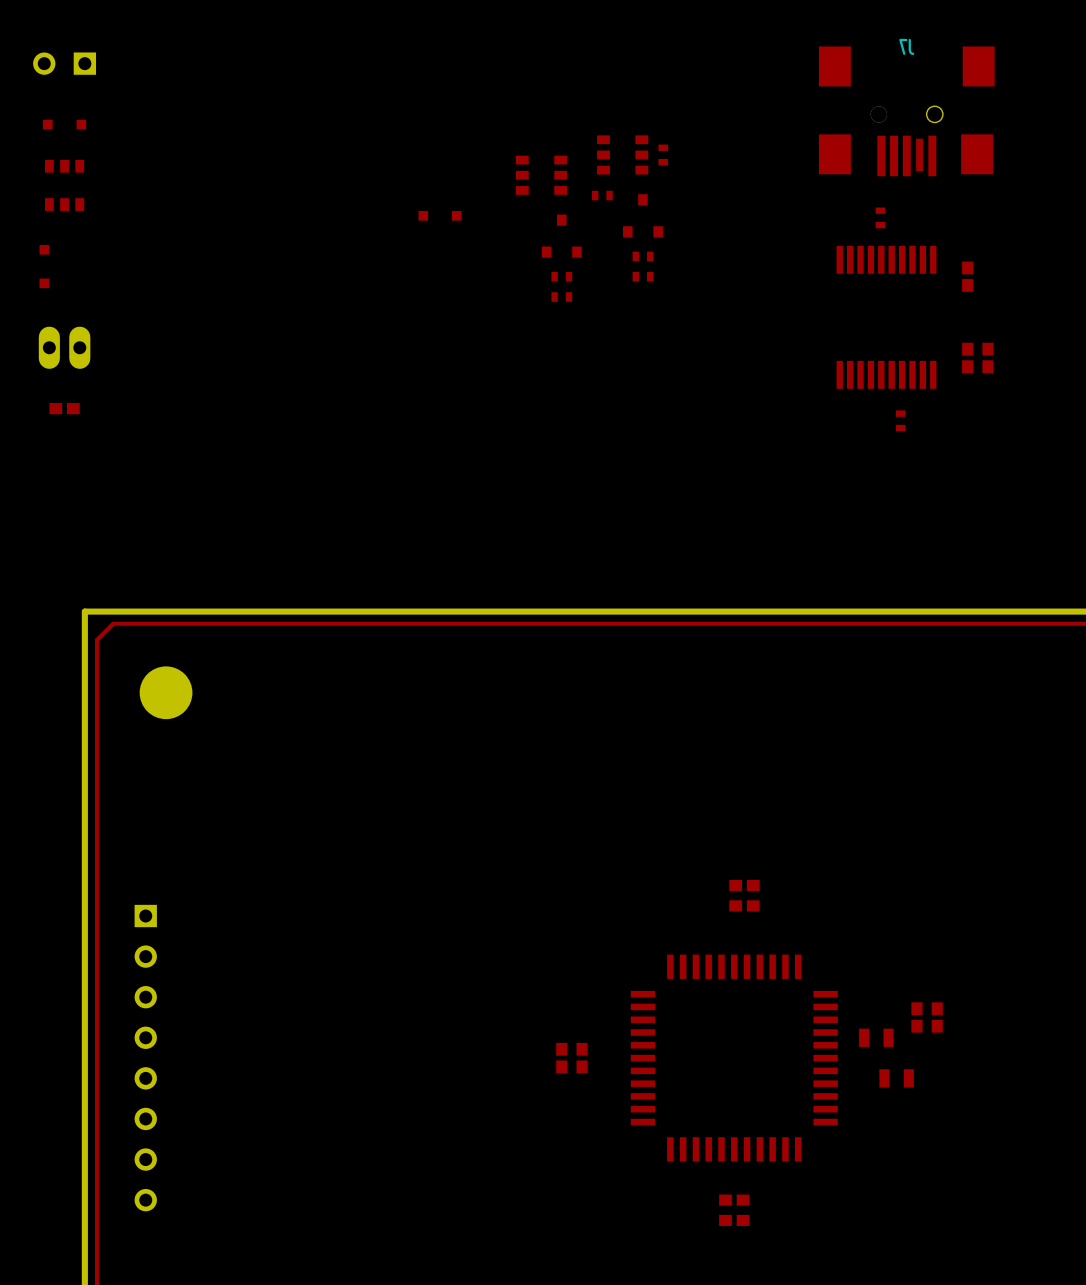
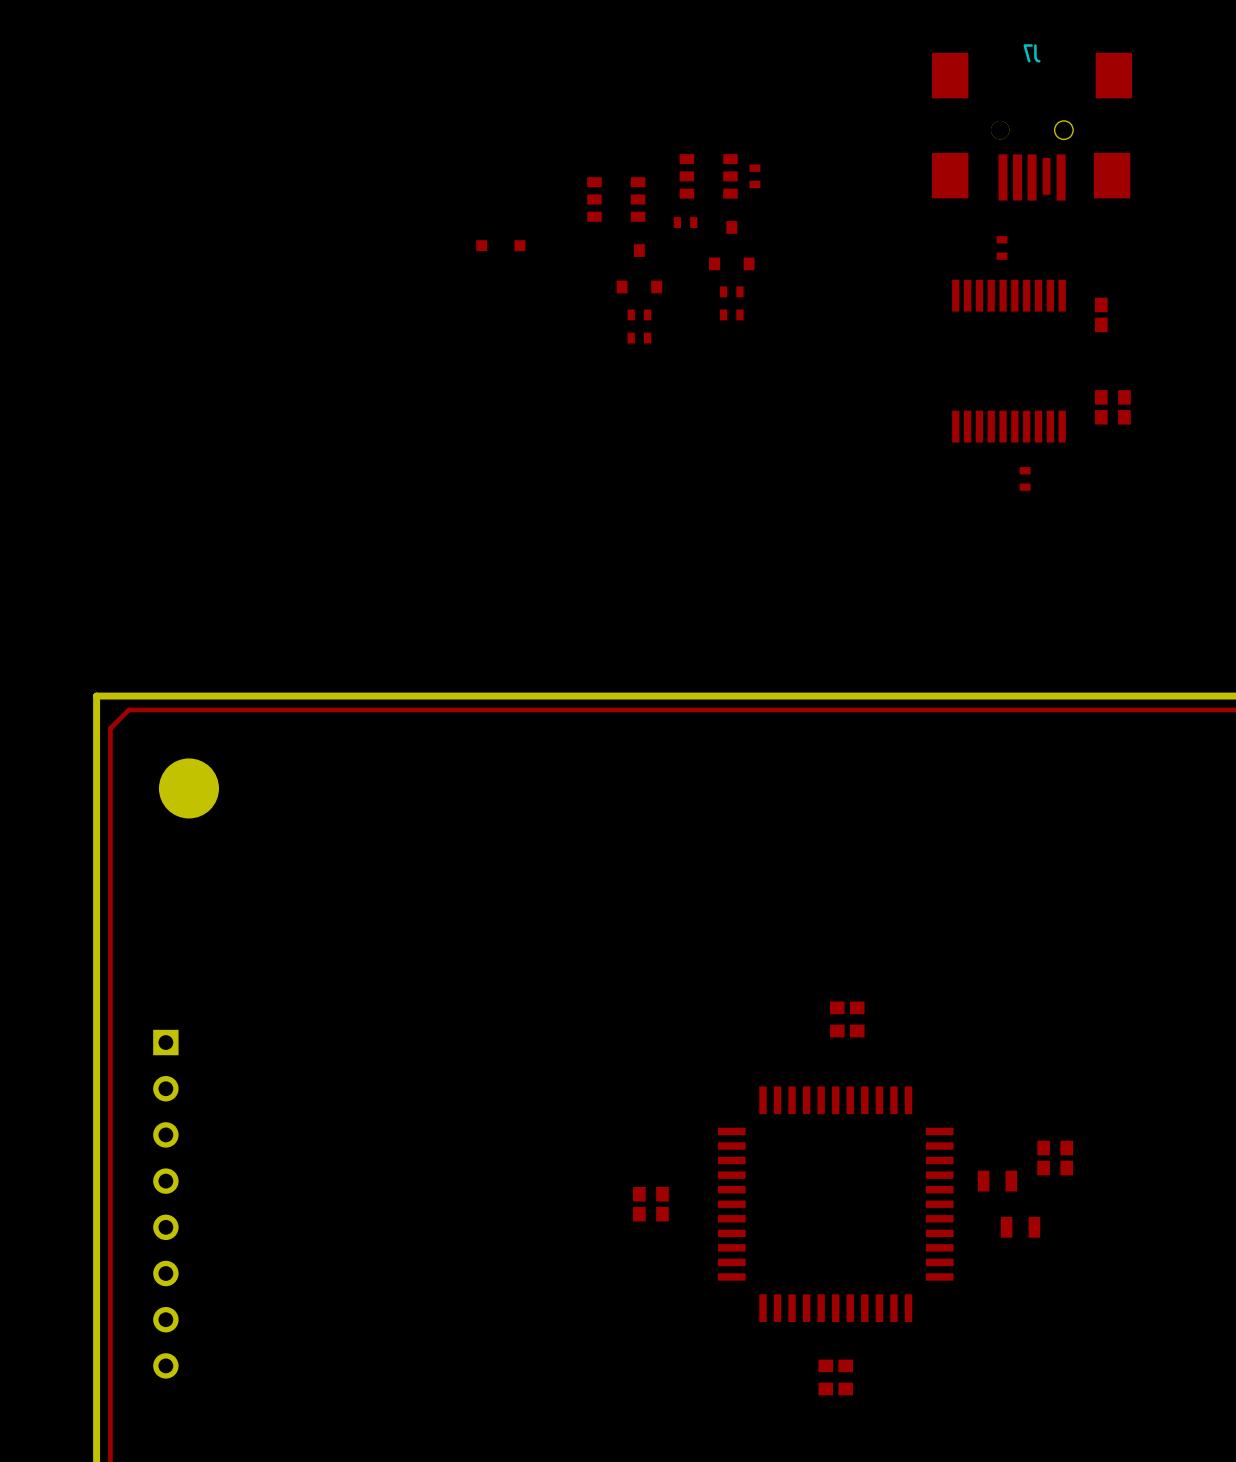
part: (64, 63) -> none
part: (64, 124) -> none
part: (64, 185) -> none
part: (44, 266) -> none
part: (64, 347) -> none
part: (64, 408) -> none

